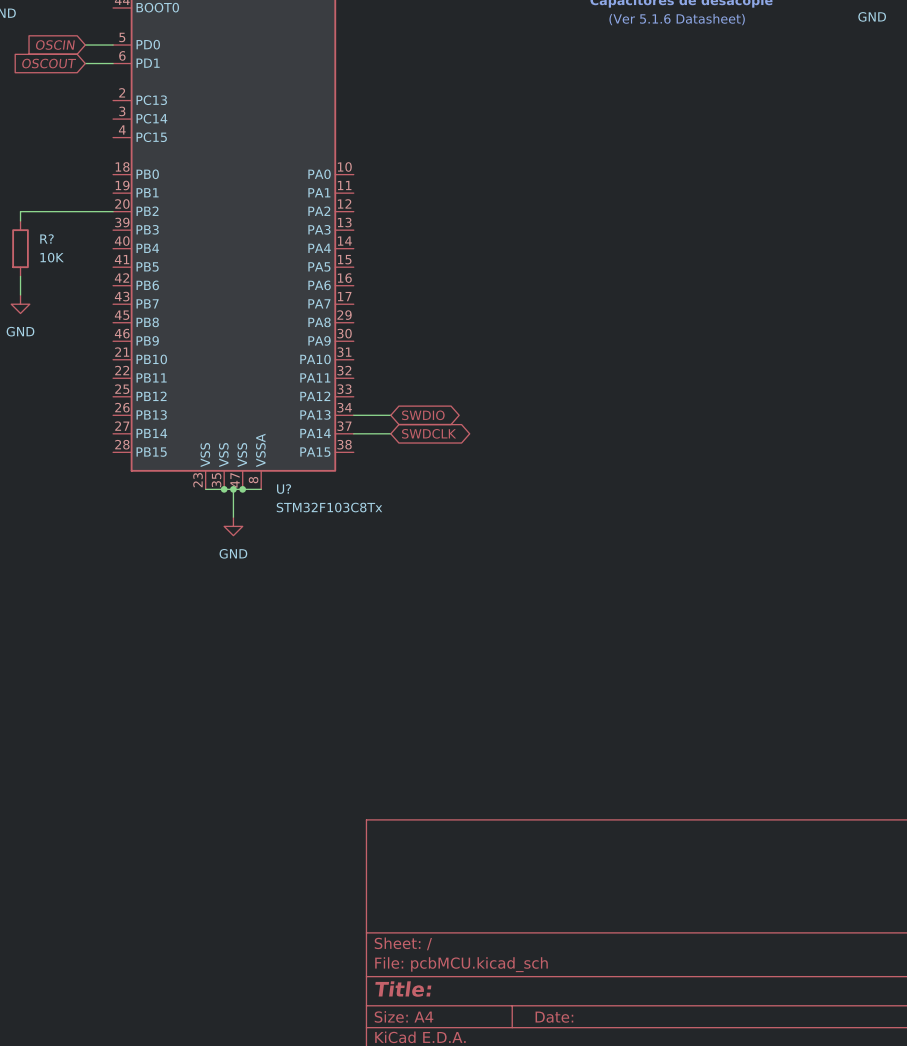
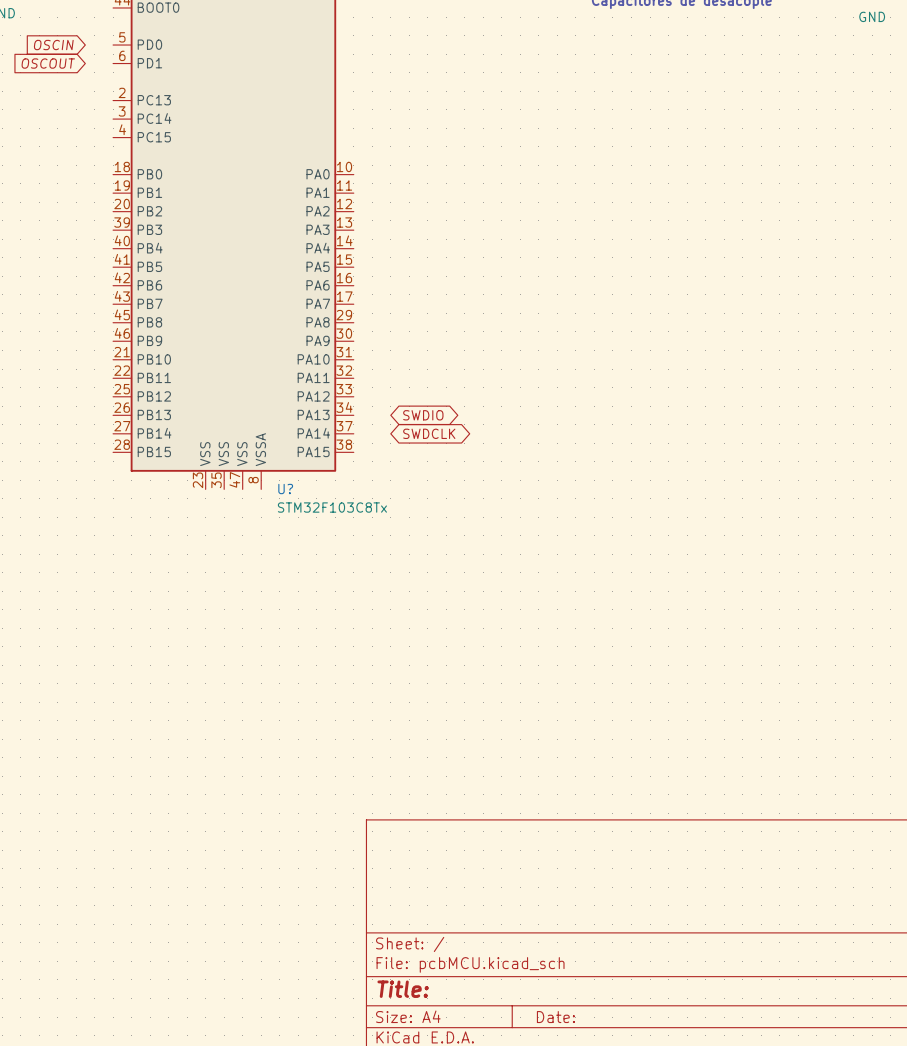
text: (Ver 5.1.6 Datasheet) (677, 19) -> none
wire: (85, 45) (113, 45) -> none
wire: (85, 63) (113, 63) -> none
wire: (113, 211) (20, 211) (20, 220) -> none
R?: 10K (20, 248) -> none
wire: (20, 276) (20, 294) -> none
power symbol: GND (20, 304) -> none
wire: (353, 415) (390, 415) -> none
wire: (353, 433) (390, 433) -> none
wire: (205, 489) (261, 489) -> none
junction: (224, 489) -> none
wire: (233, 489) (233, 517) -> none
junction: (233, 489) -> none
junction: (242, 489) -> none
power symbol: GND (233, 526) -> none

